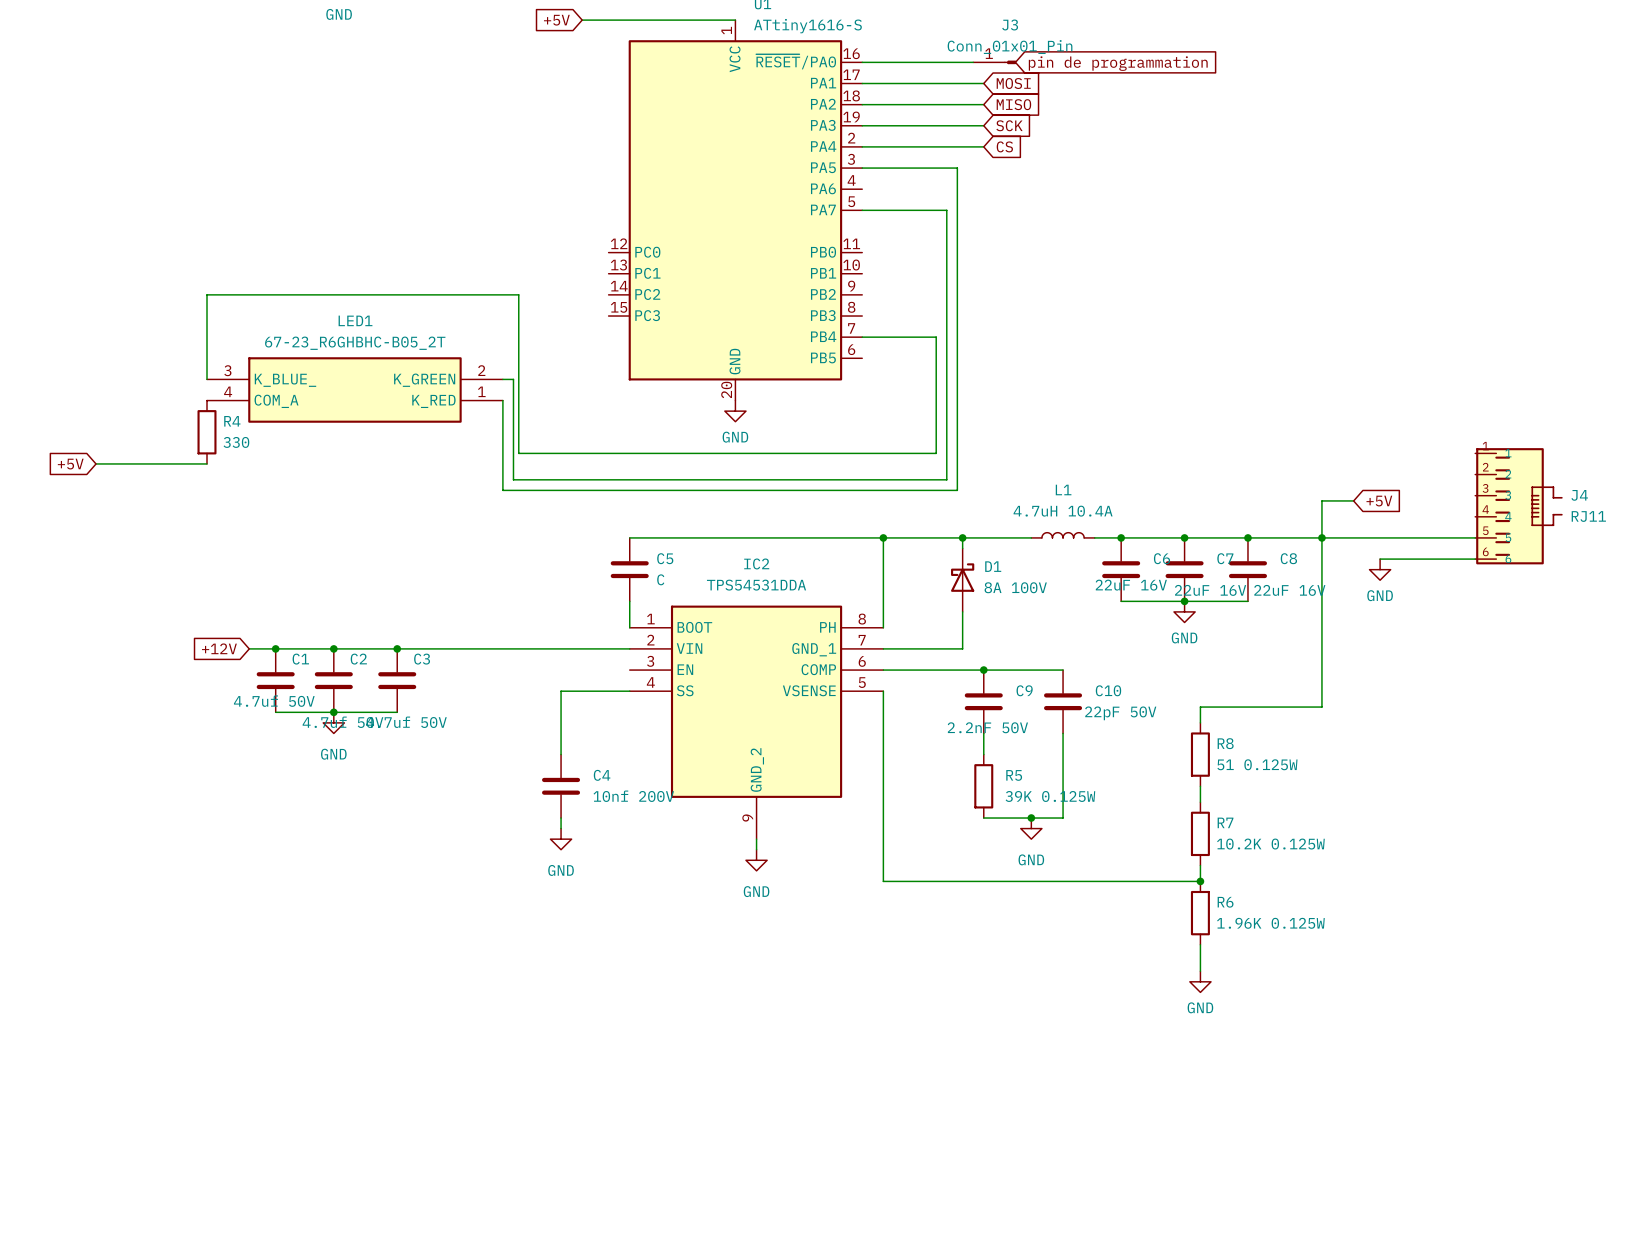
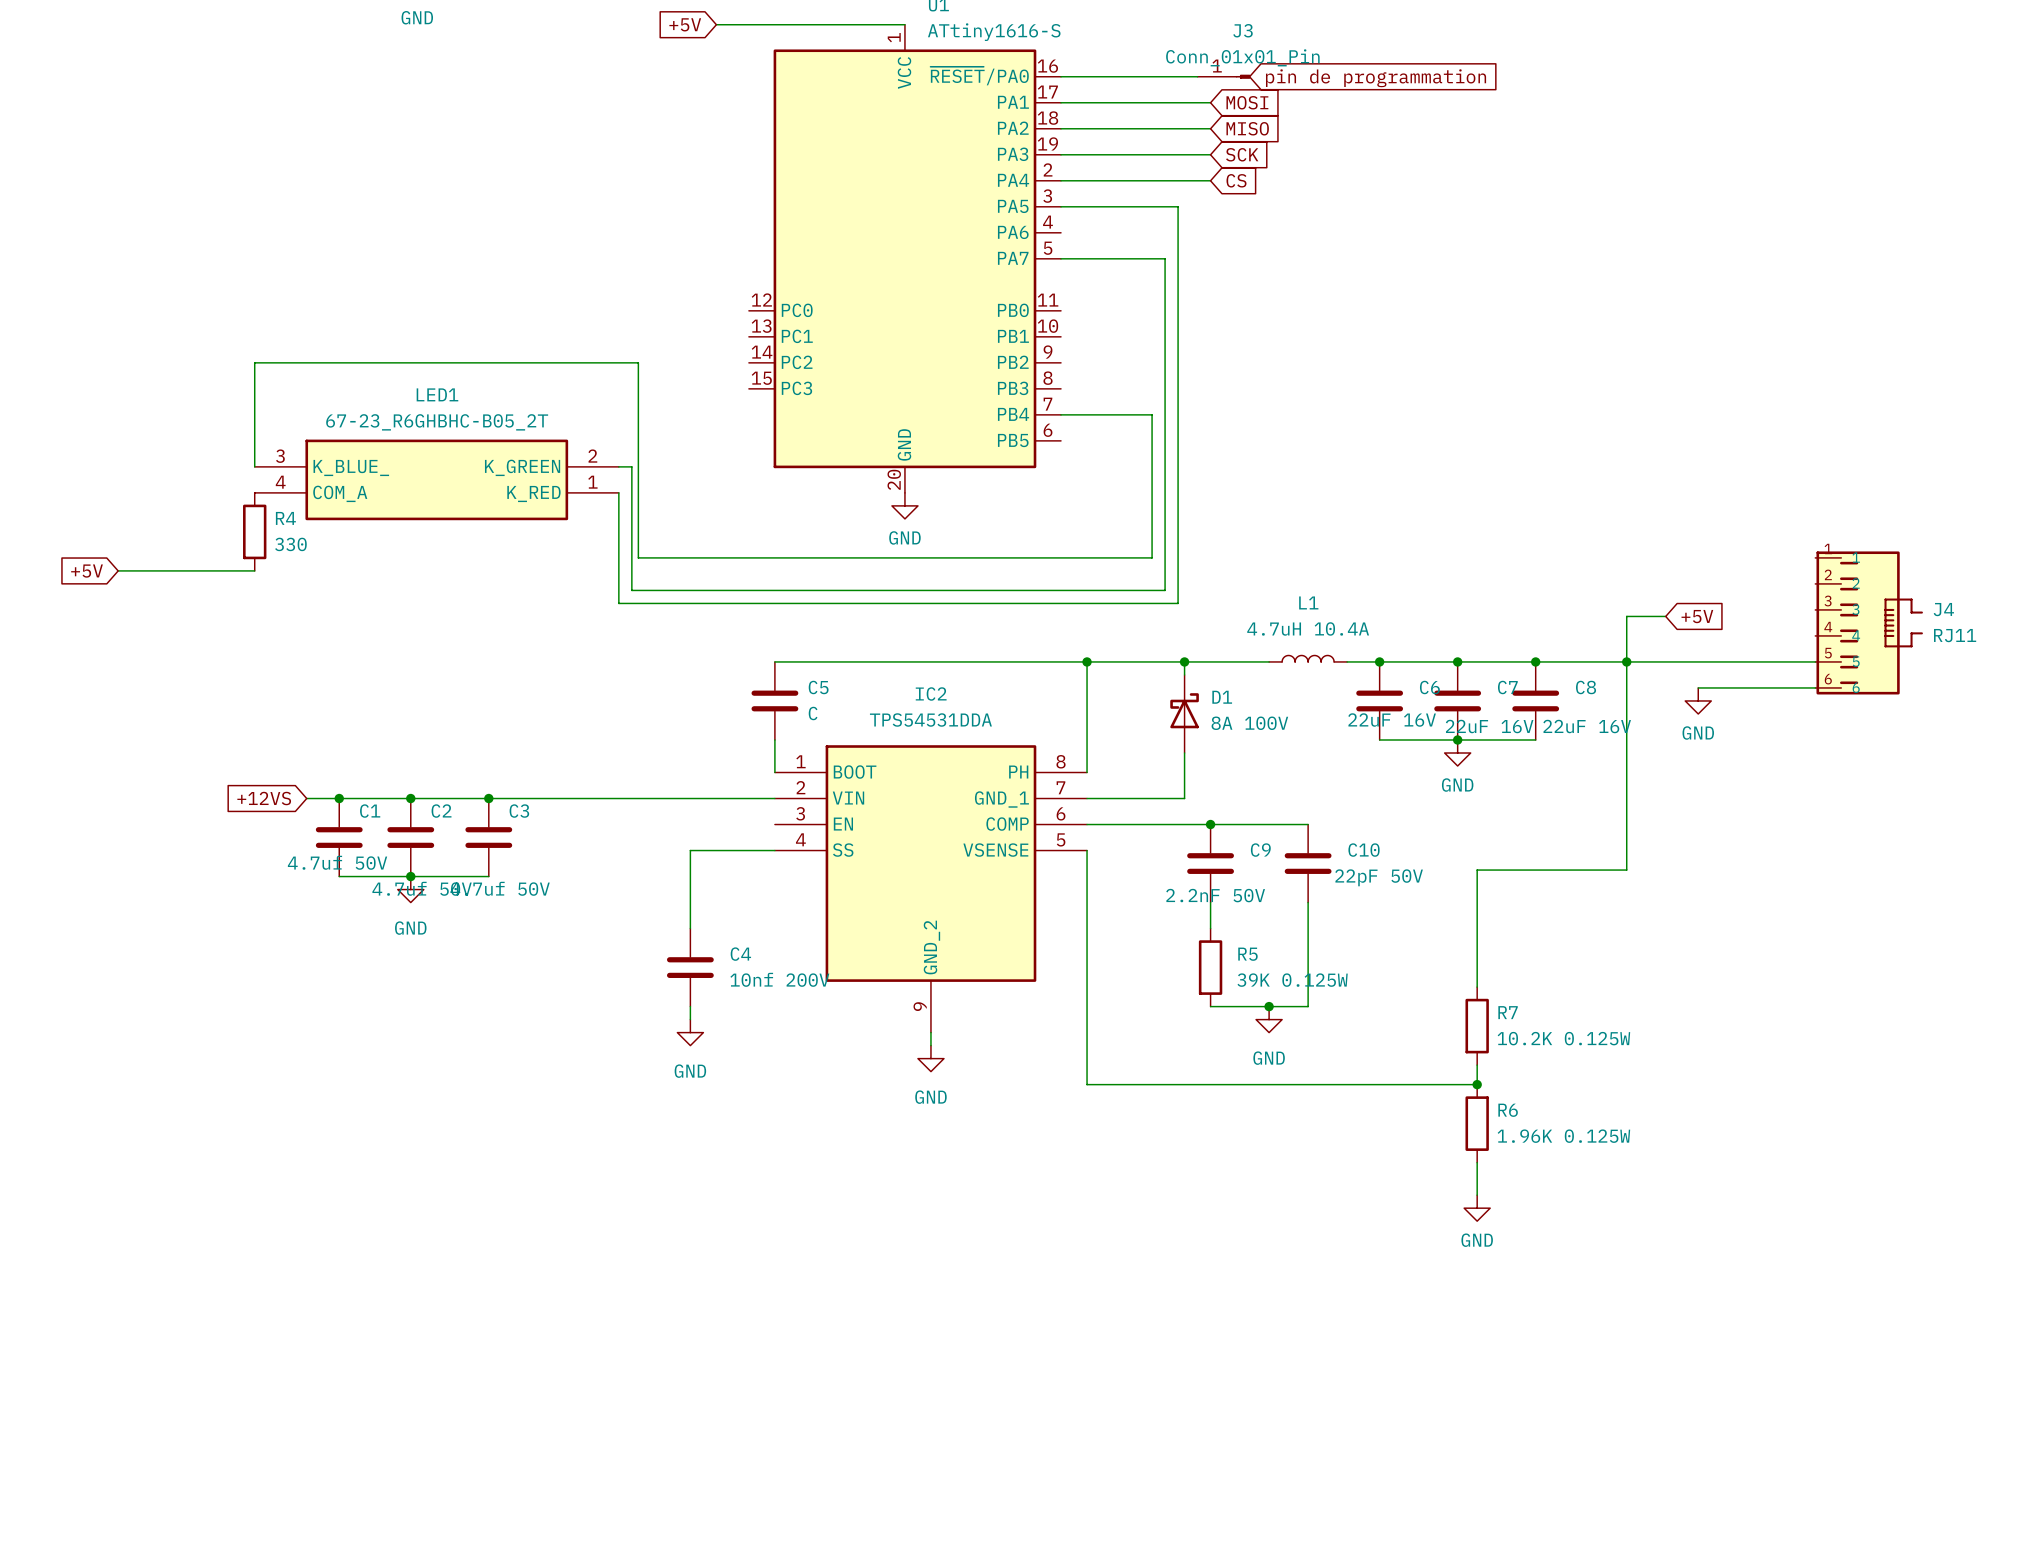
global label: +12V (219, 648) -> +12VS (264, 798)
wire: none -> (1477, 889) (1477, 967)
R8: 51 0.125W (1200, 754) -> none

